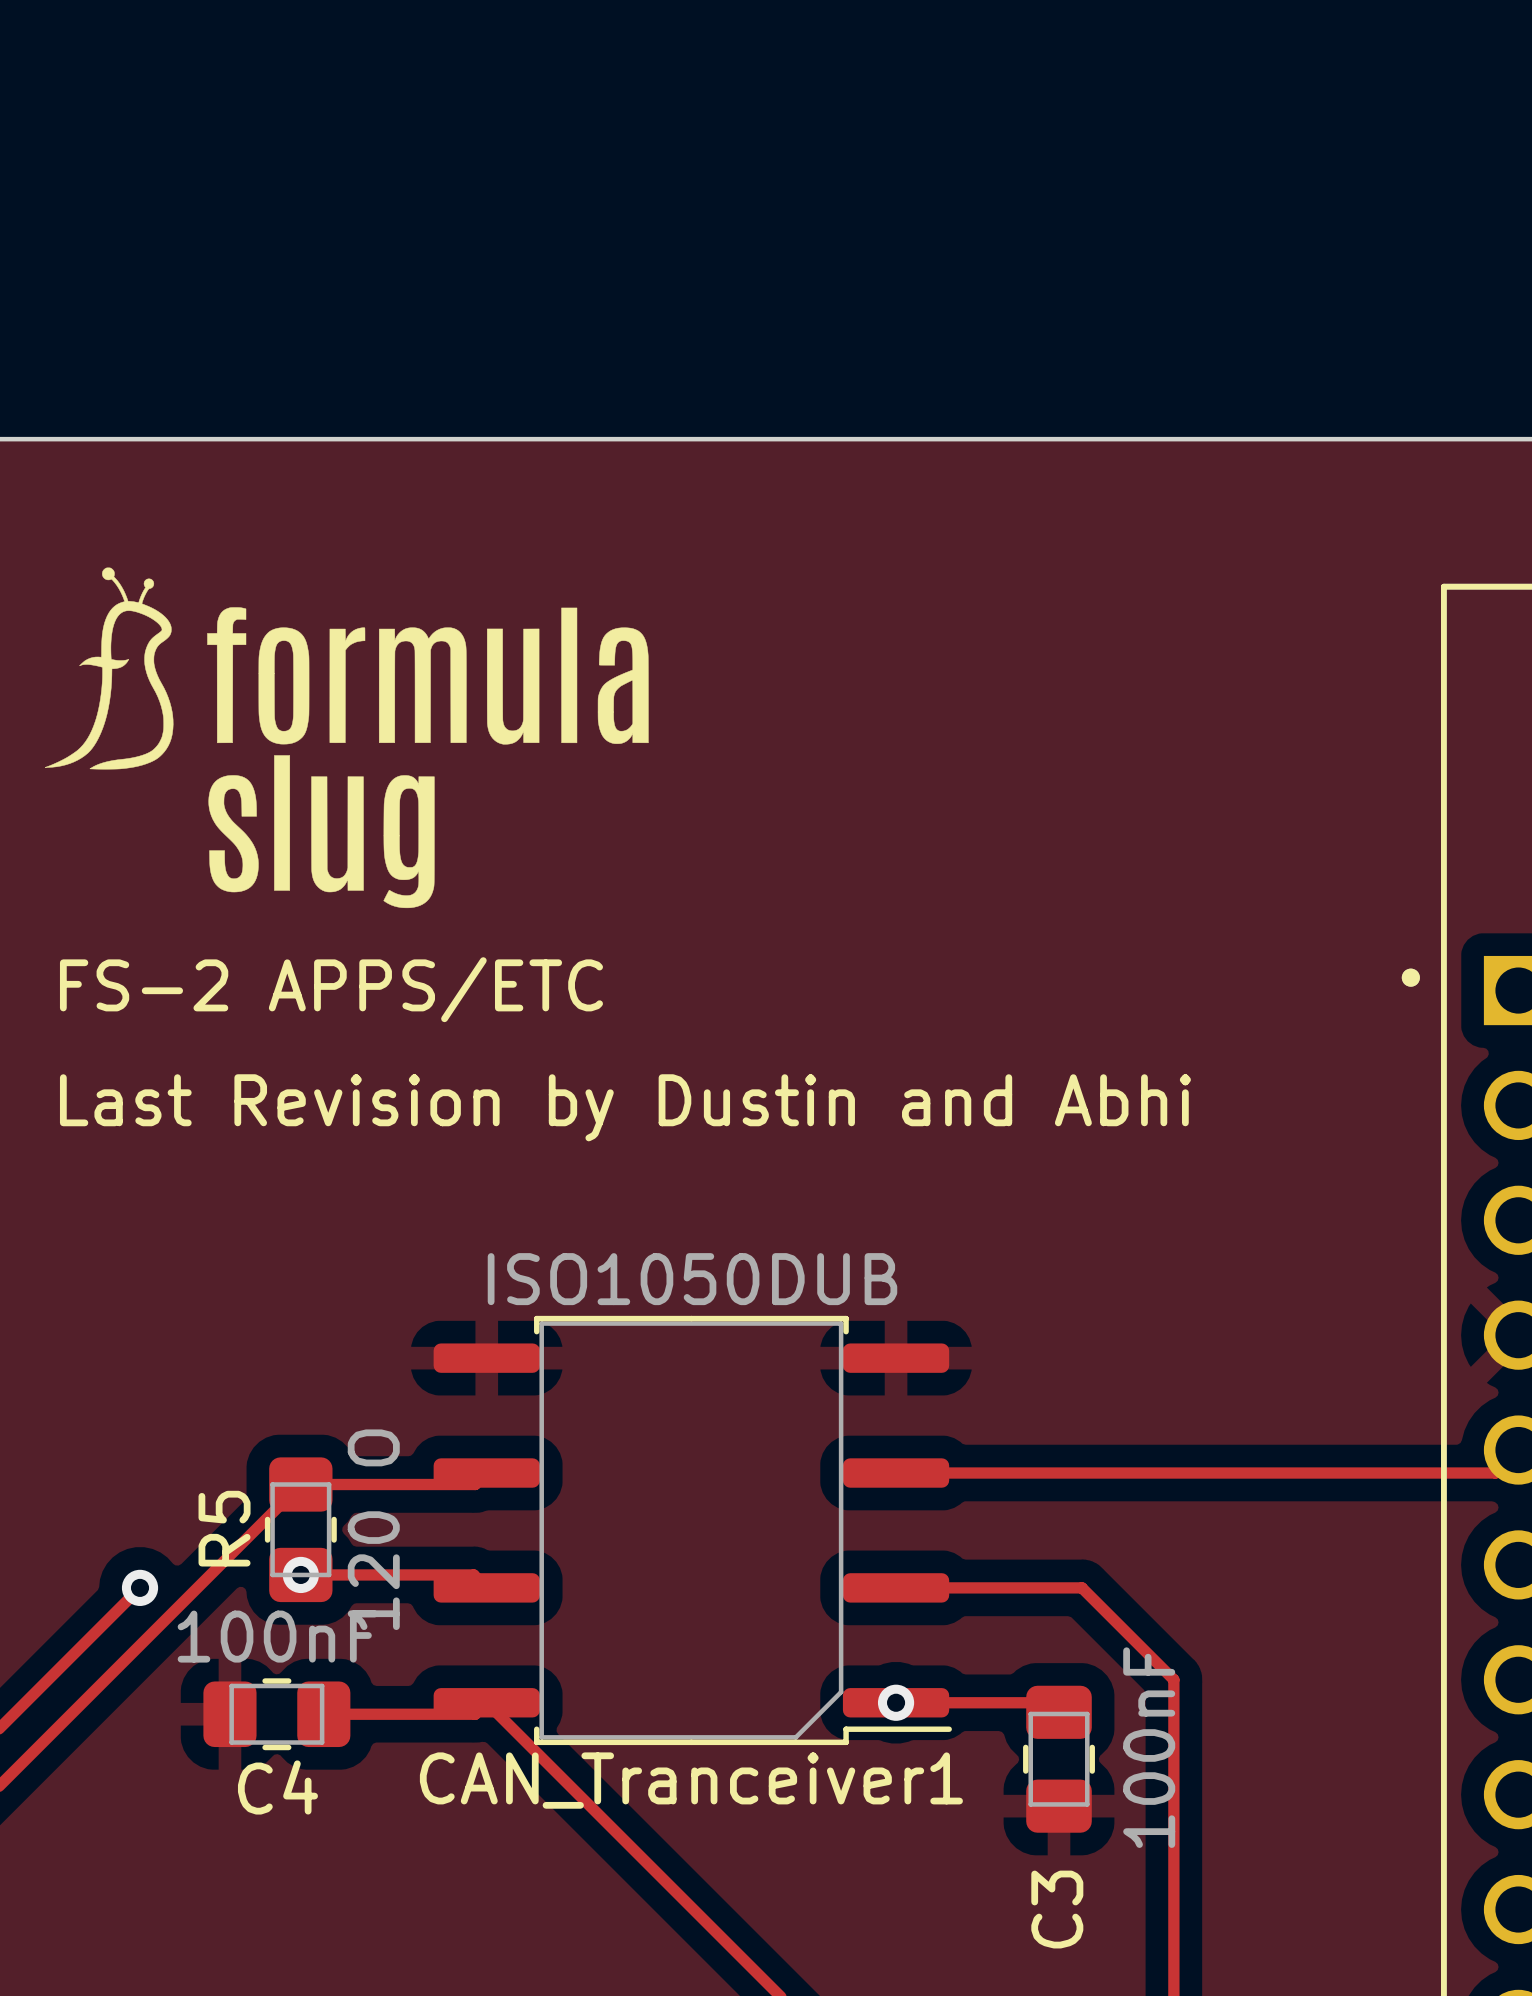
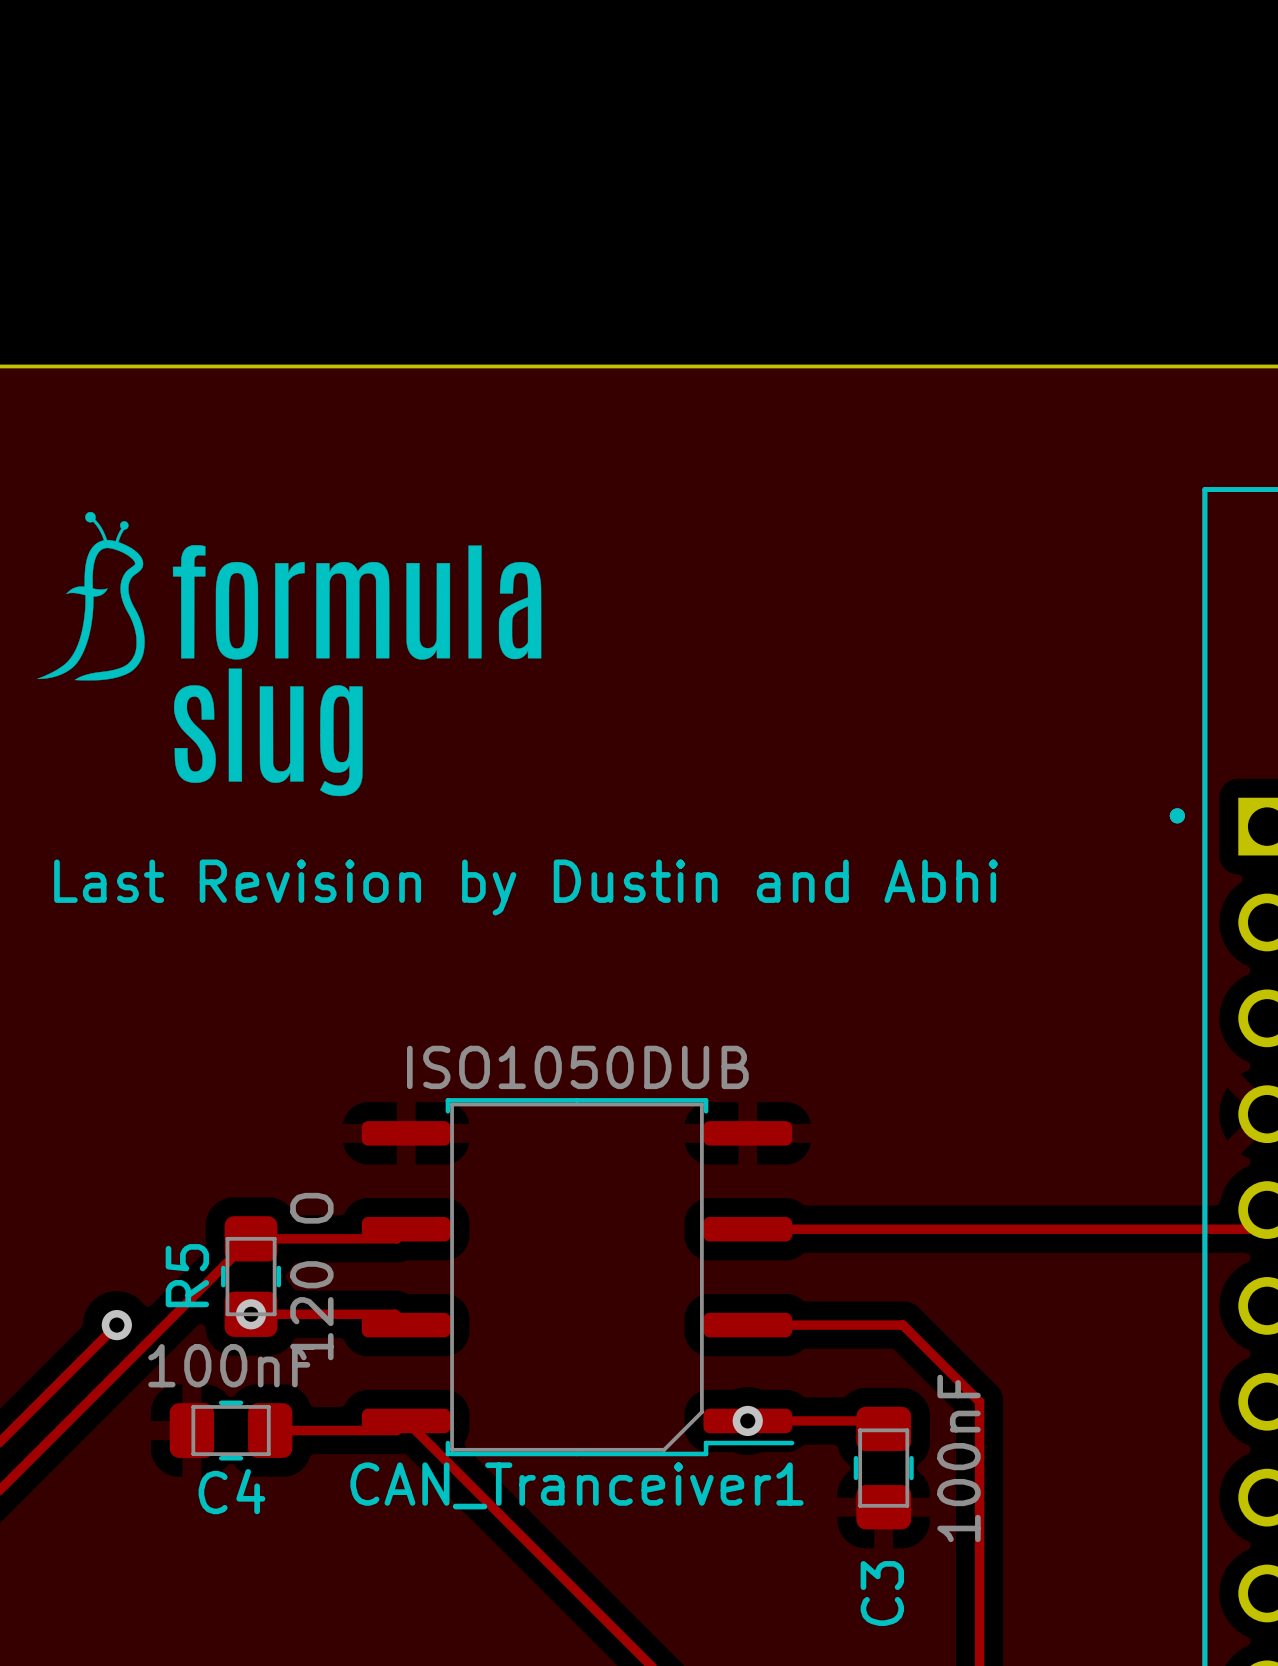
drawing position: (346, 737) -> (289, 654)
text: FS-2 APPS/ETC (331, 989) -> none
text position: Last Revision by Dustin and Abhi (625, 1107) -> Last Revision by Dustin and Abhi (526, 887)

